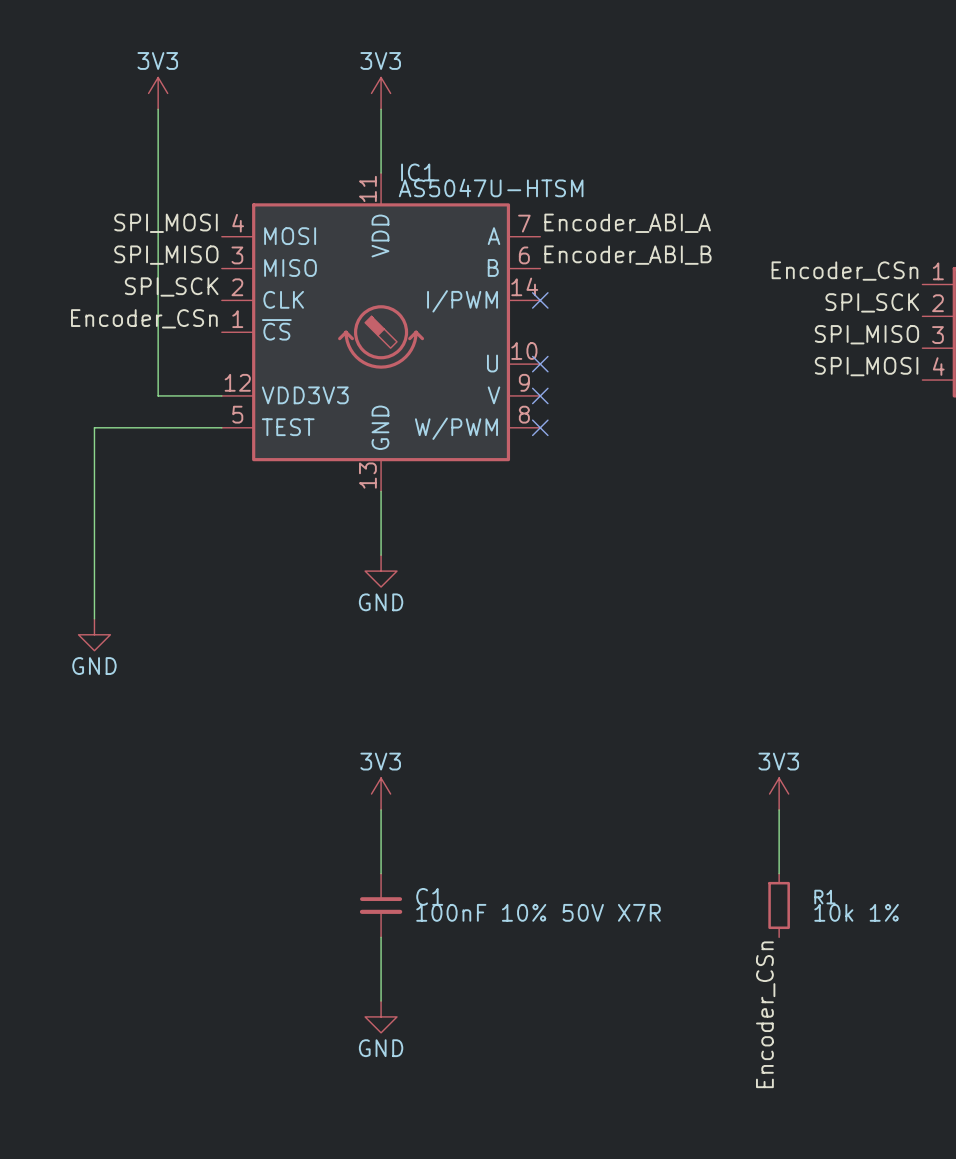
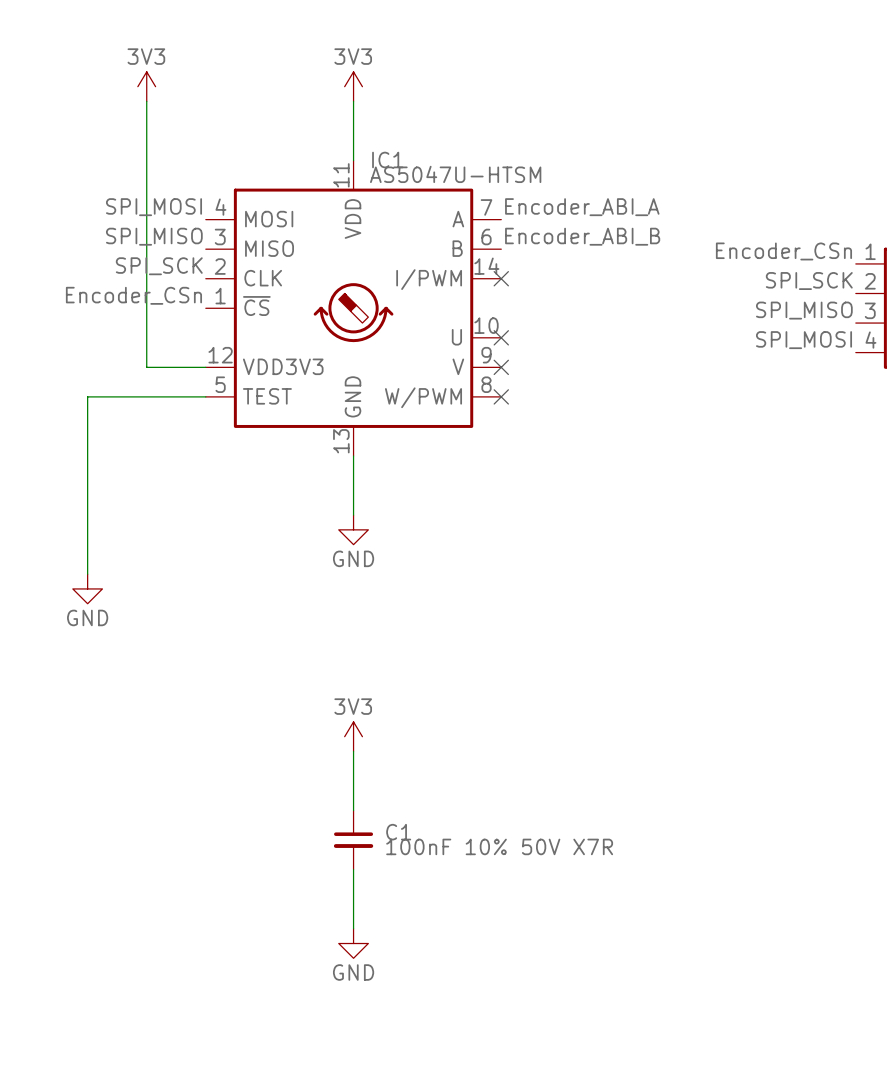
power symbol: 3V3 (779, 794) -> none
wire: (779, 809) (779, 873) -> none
R1: 10k 1% (779, 905) -> none
label: Encoder_CSn (765, 1014) -> none

